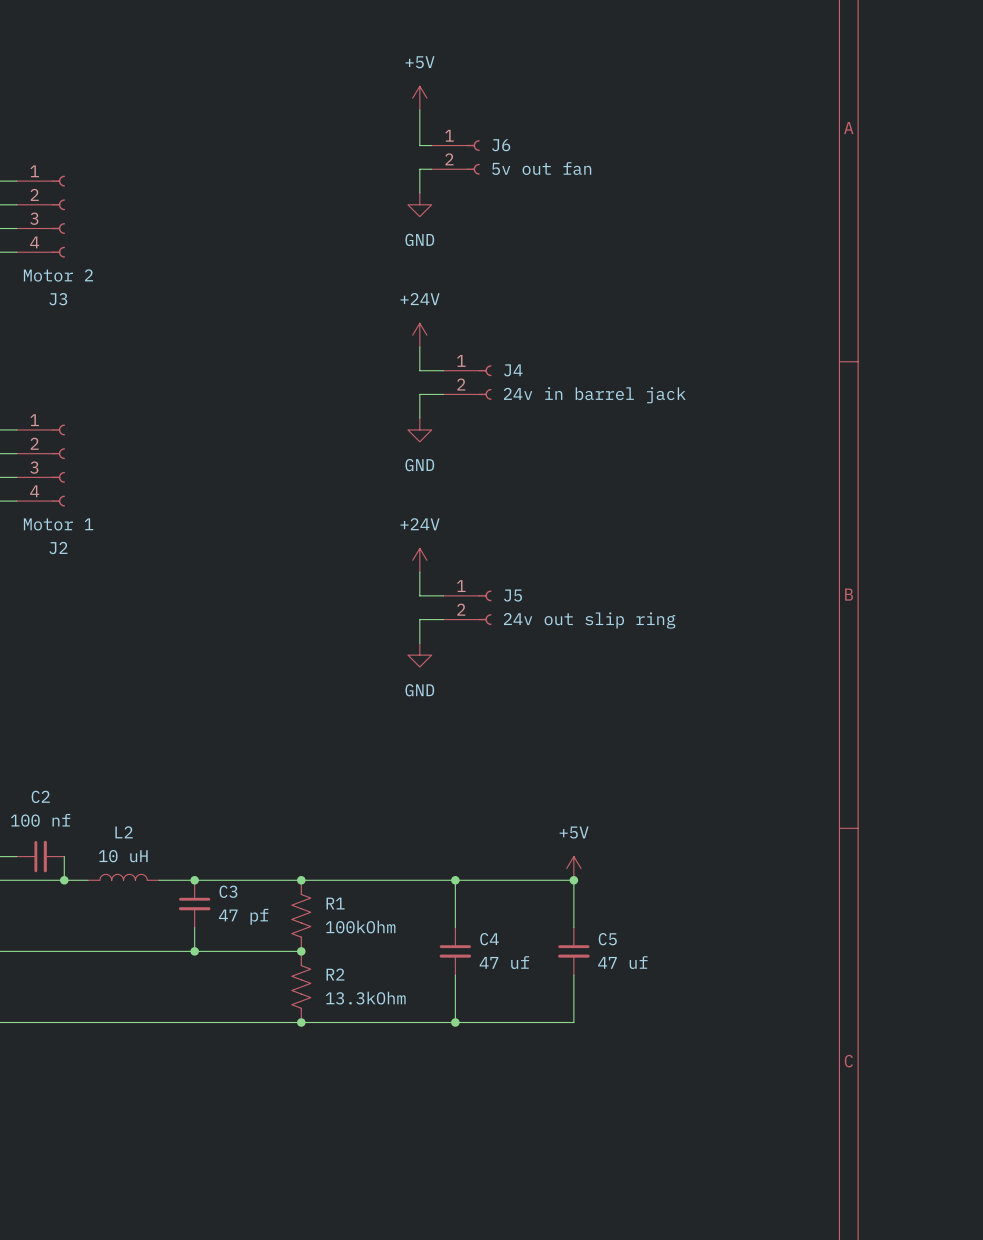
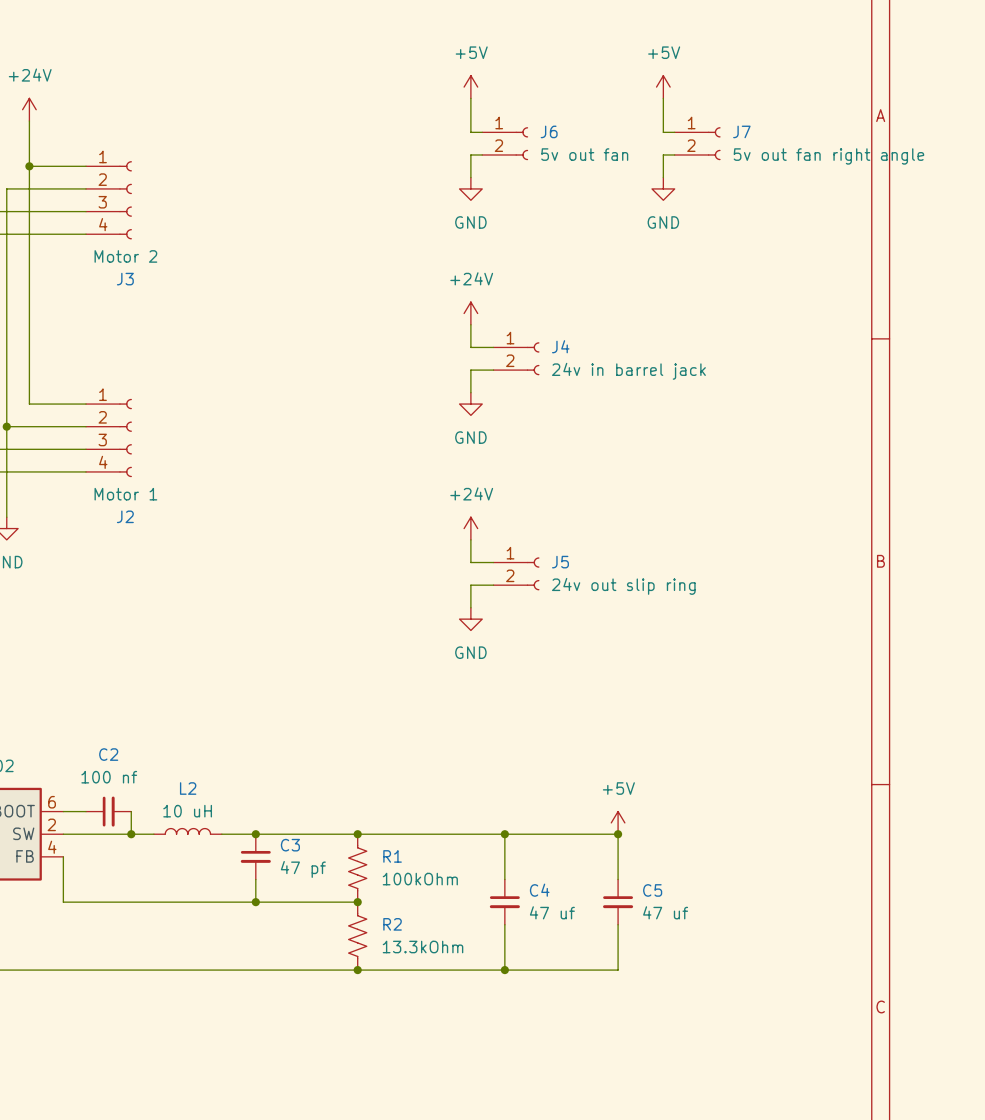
power symbol: none -> +5V (663, 87)
wire: none -> (663, 98) (663, 132) (674, 132)
J7: none -> 5v out fan right angle (697, 143)
wire: none -> (674, 154) (663, 154) (663, 177)
power symbol: none -> GND (663, 188)

